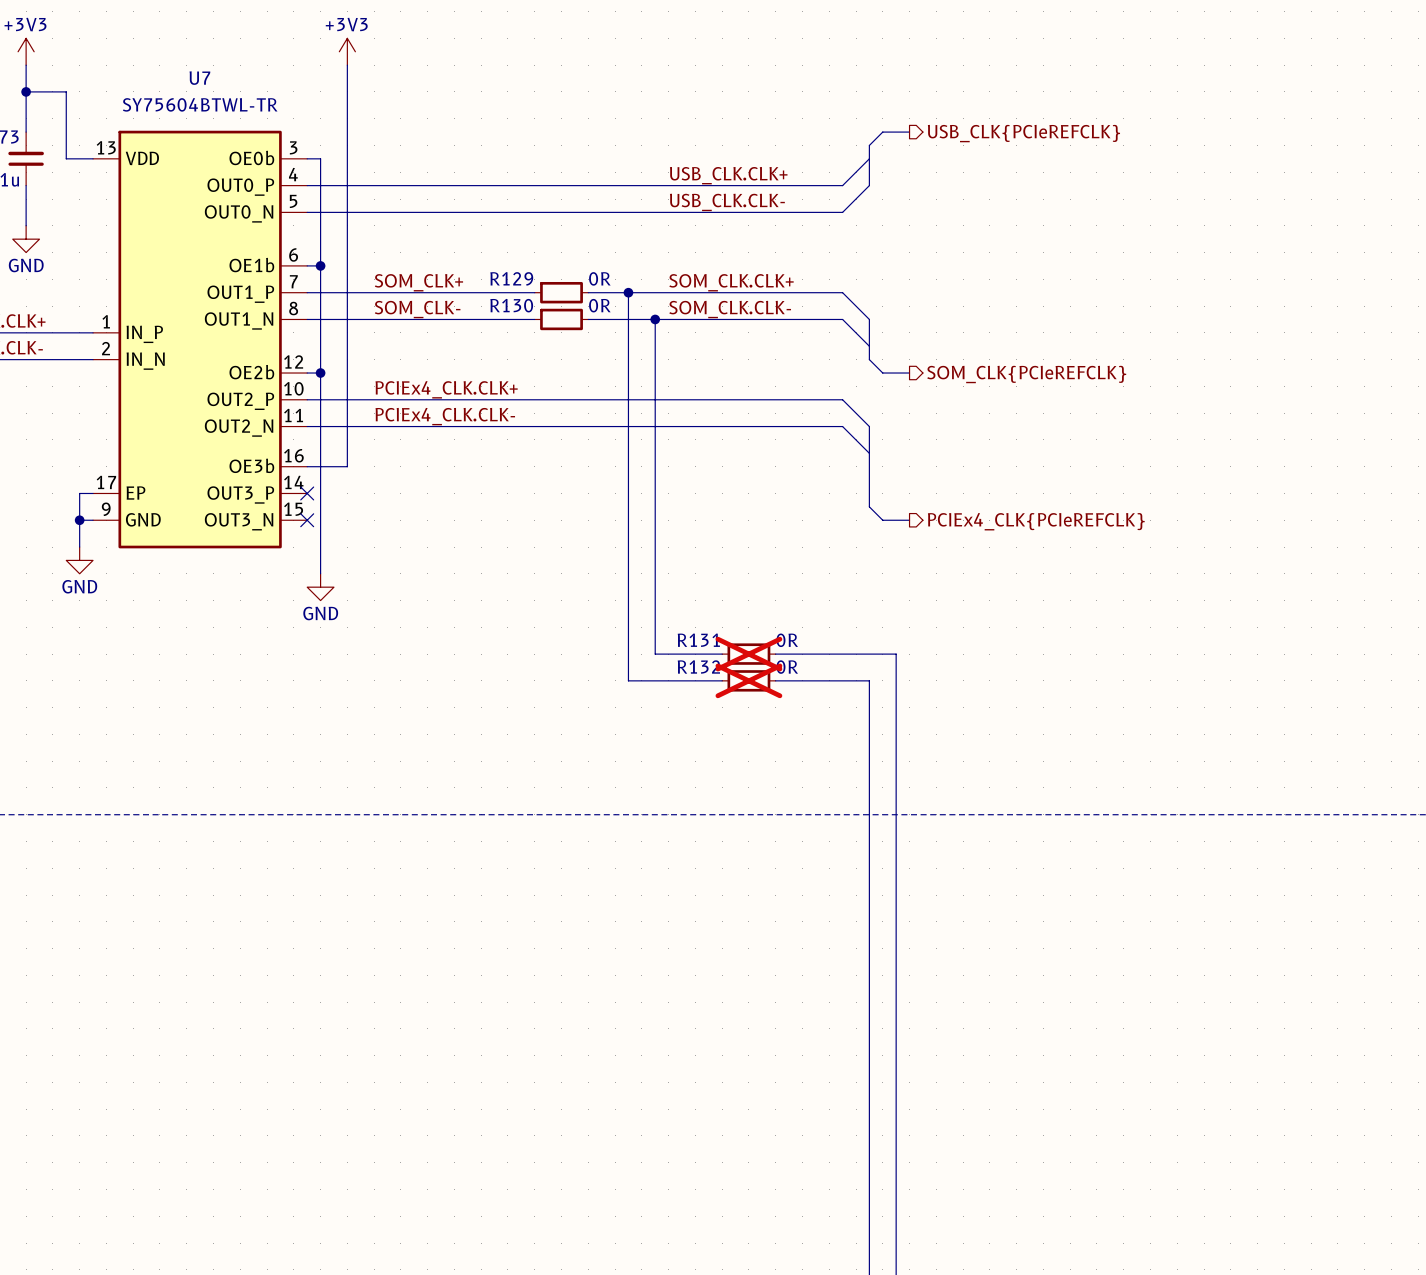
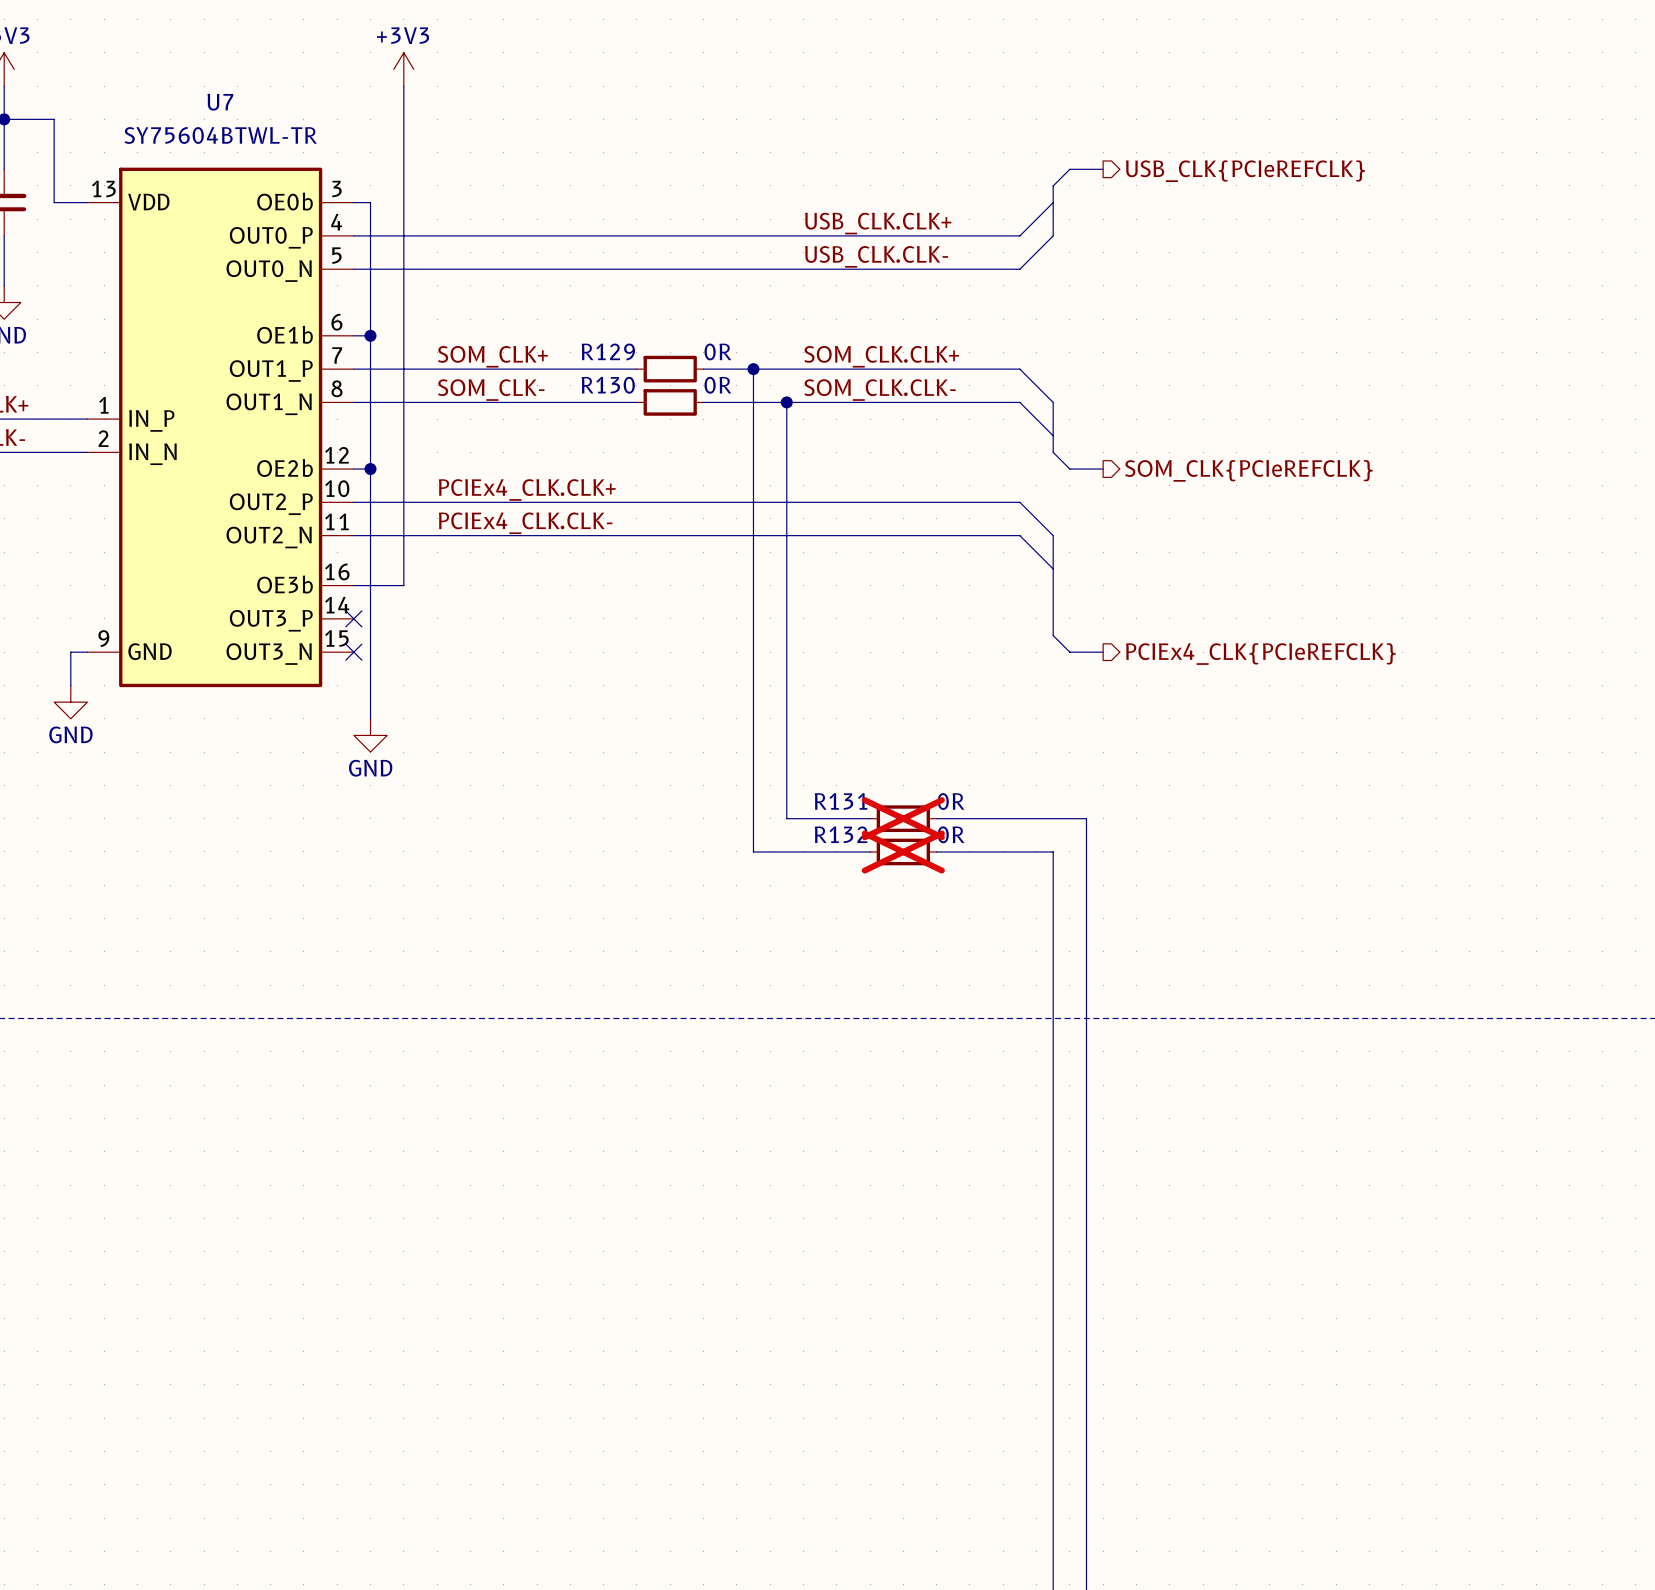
U7 symbol: [93, 130, 308, 549] -> [87, 167, 354, 688]
wire: (93, 493) (79, 493) (79, 520) -> none
junction: (79, 520) -> none

